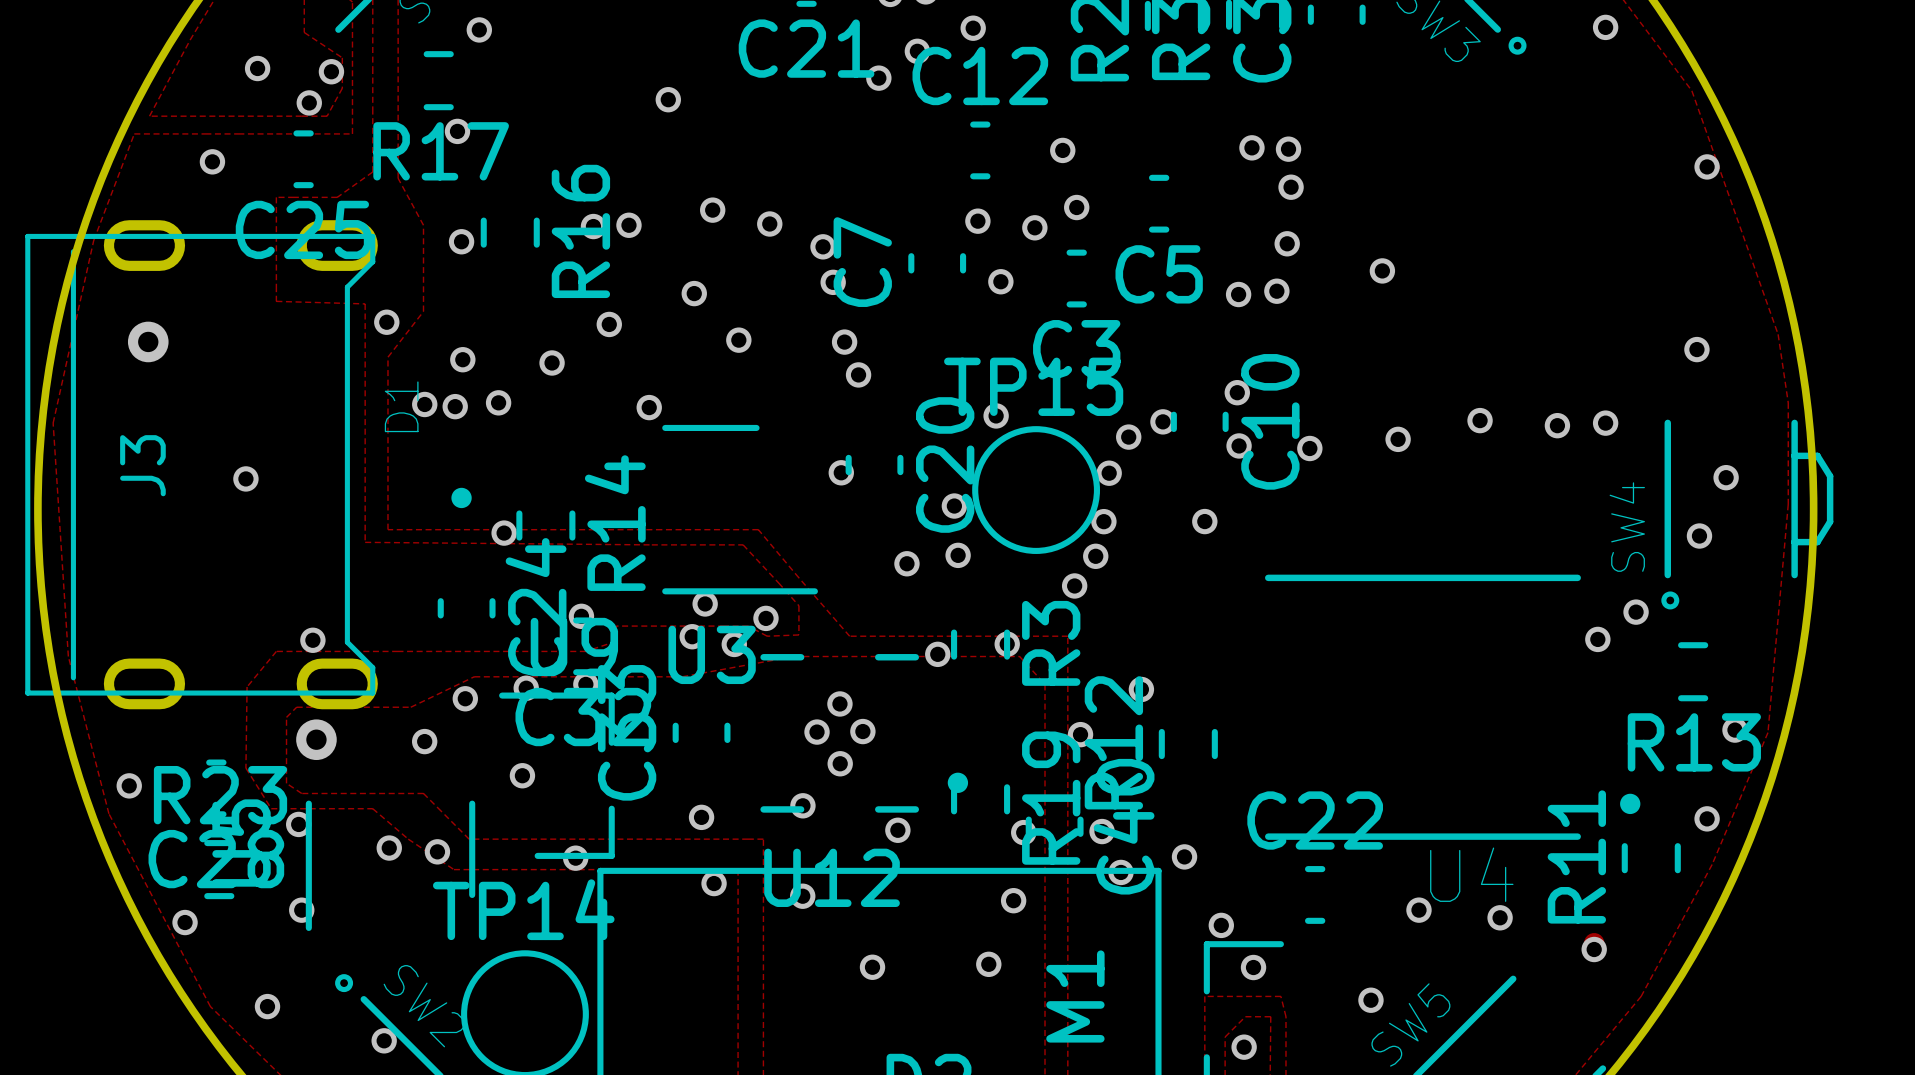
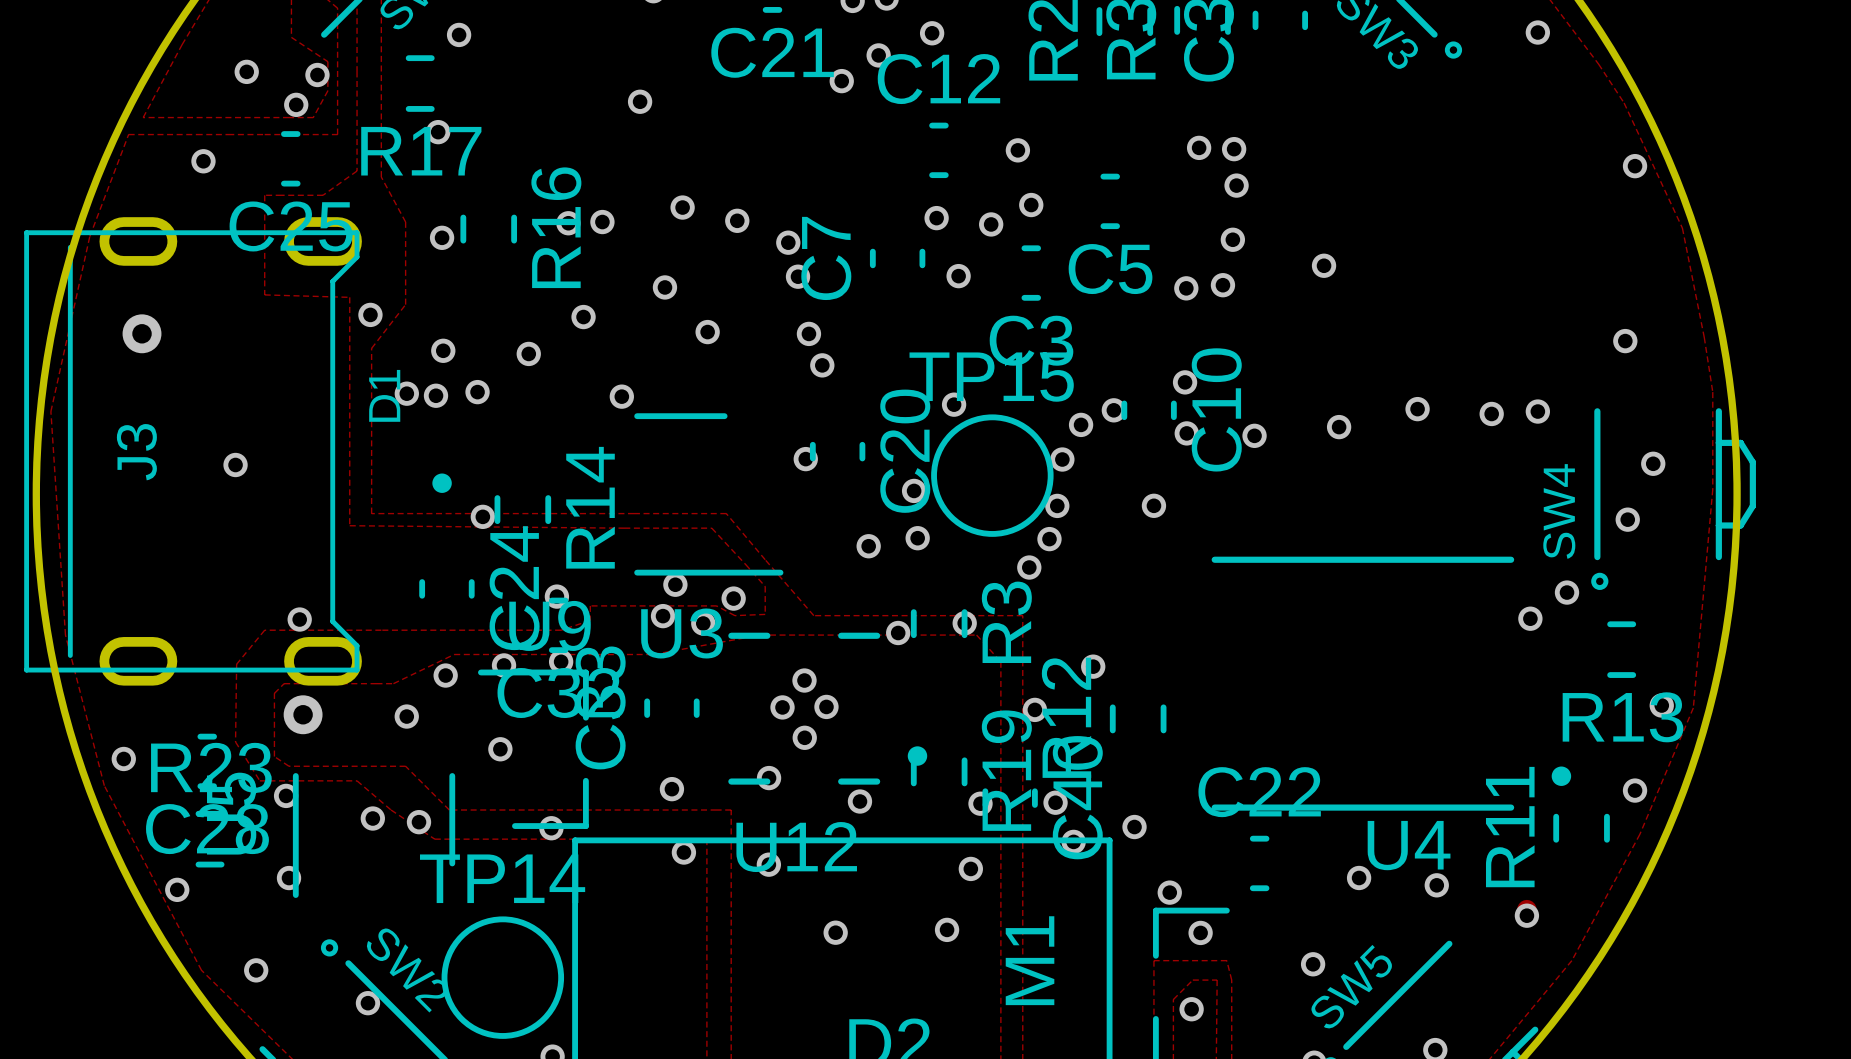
zone outline: (1669, 60) (1691, 90) (1778, 334) (1788, 402) -> (1598, 64) (1624, 102) (1682, 228) (1704, 337) (1712, 392)

